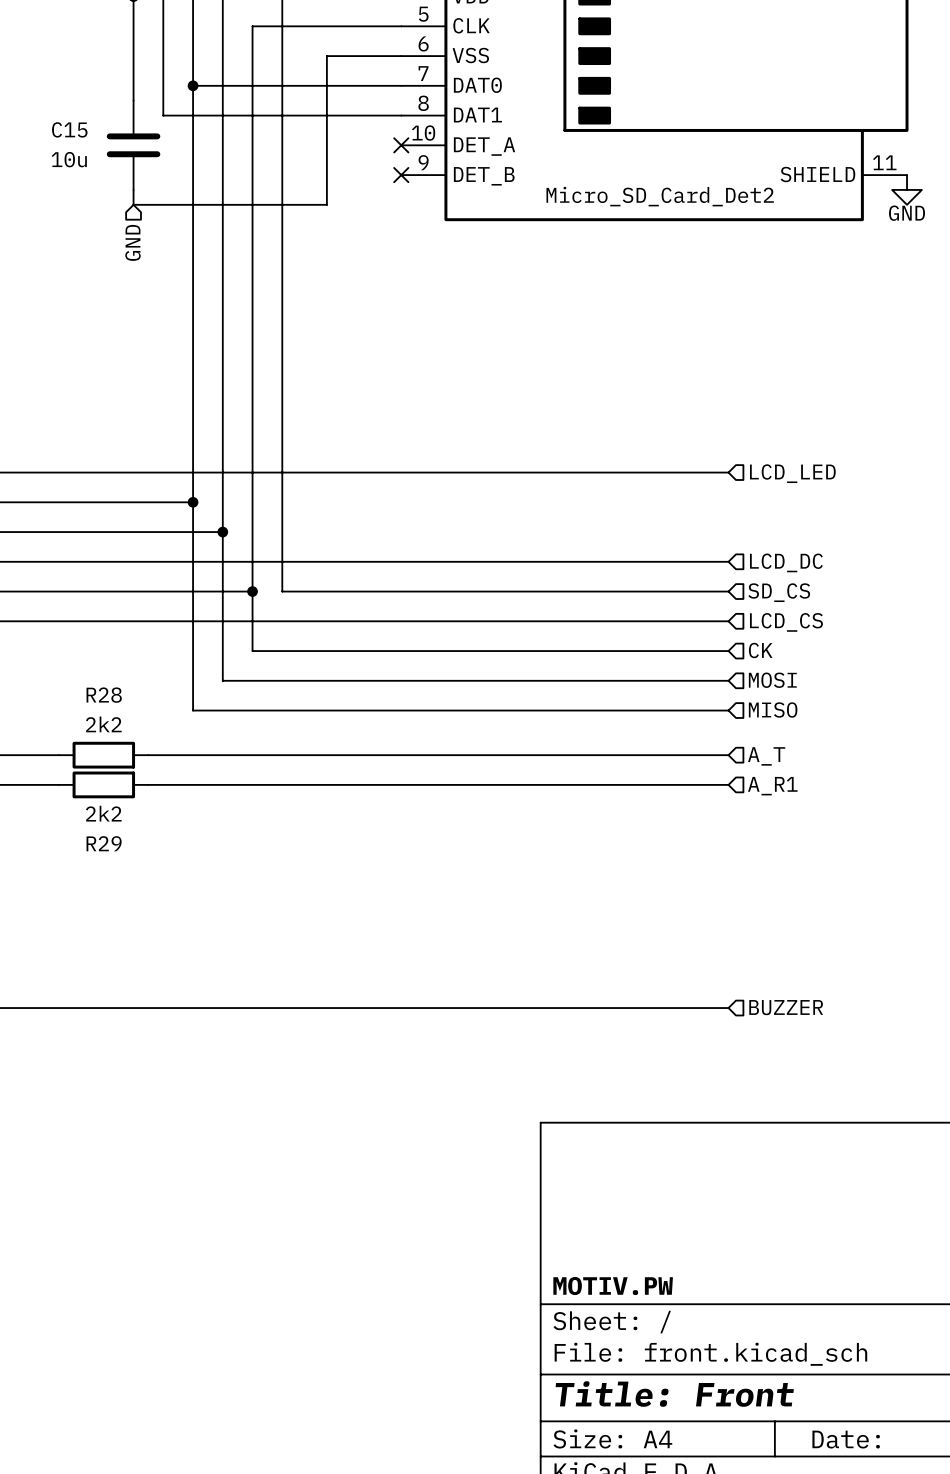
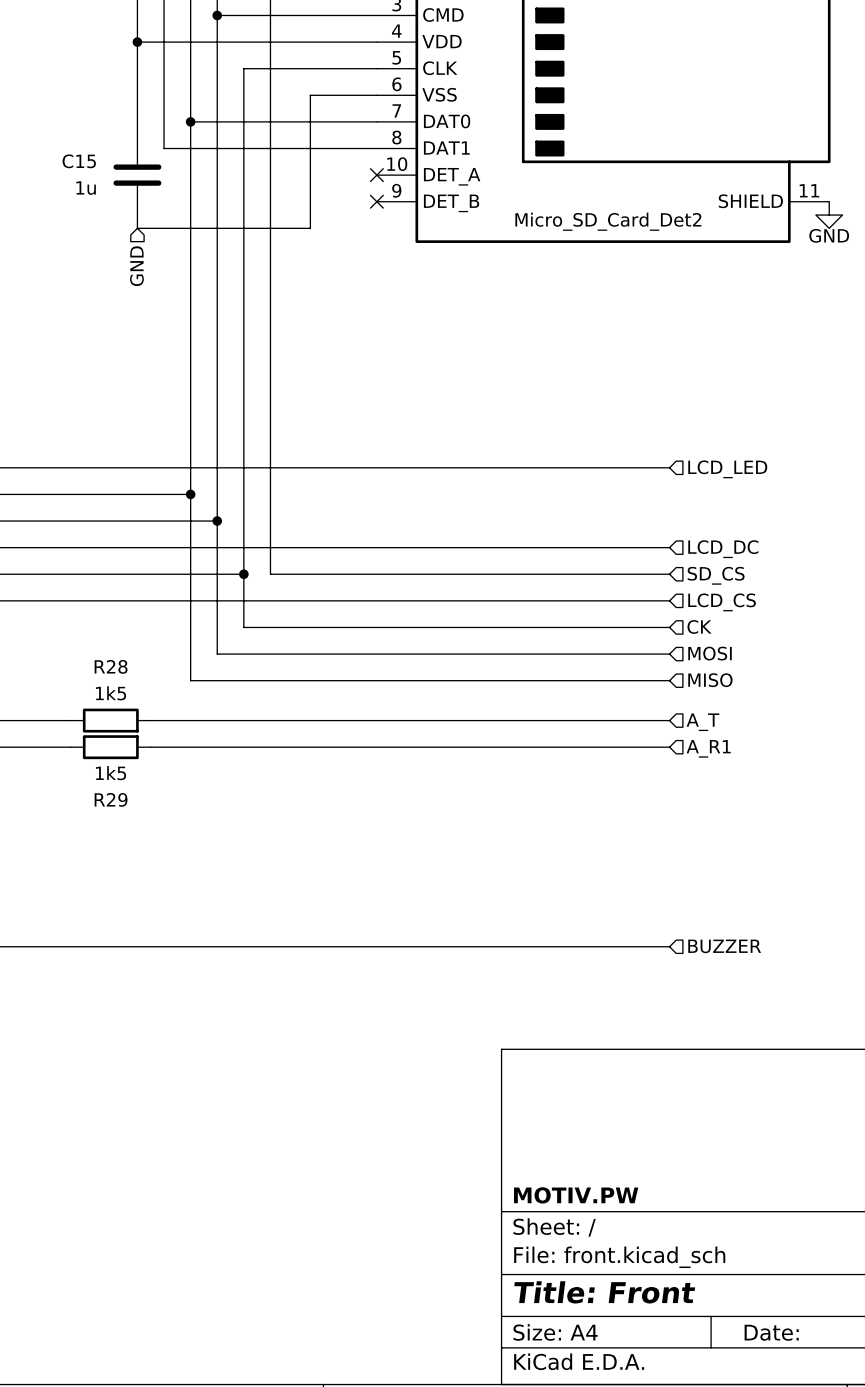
C15 value: 10u (69, 159) -> 1u (86, 188)
R28 value: 2k2 (103, 724) -> 1k5 (111, 693)
R29 value: 2k2 (103, 813) -> 1k5 (111, 773)

